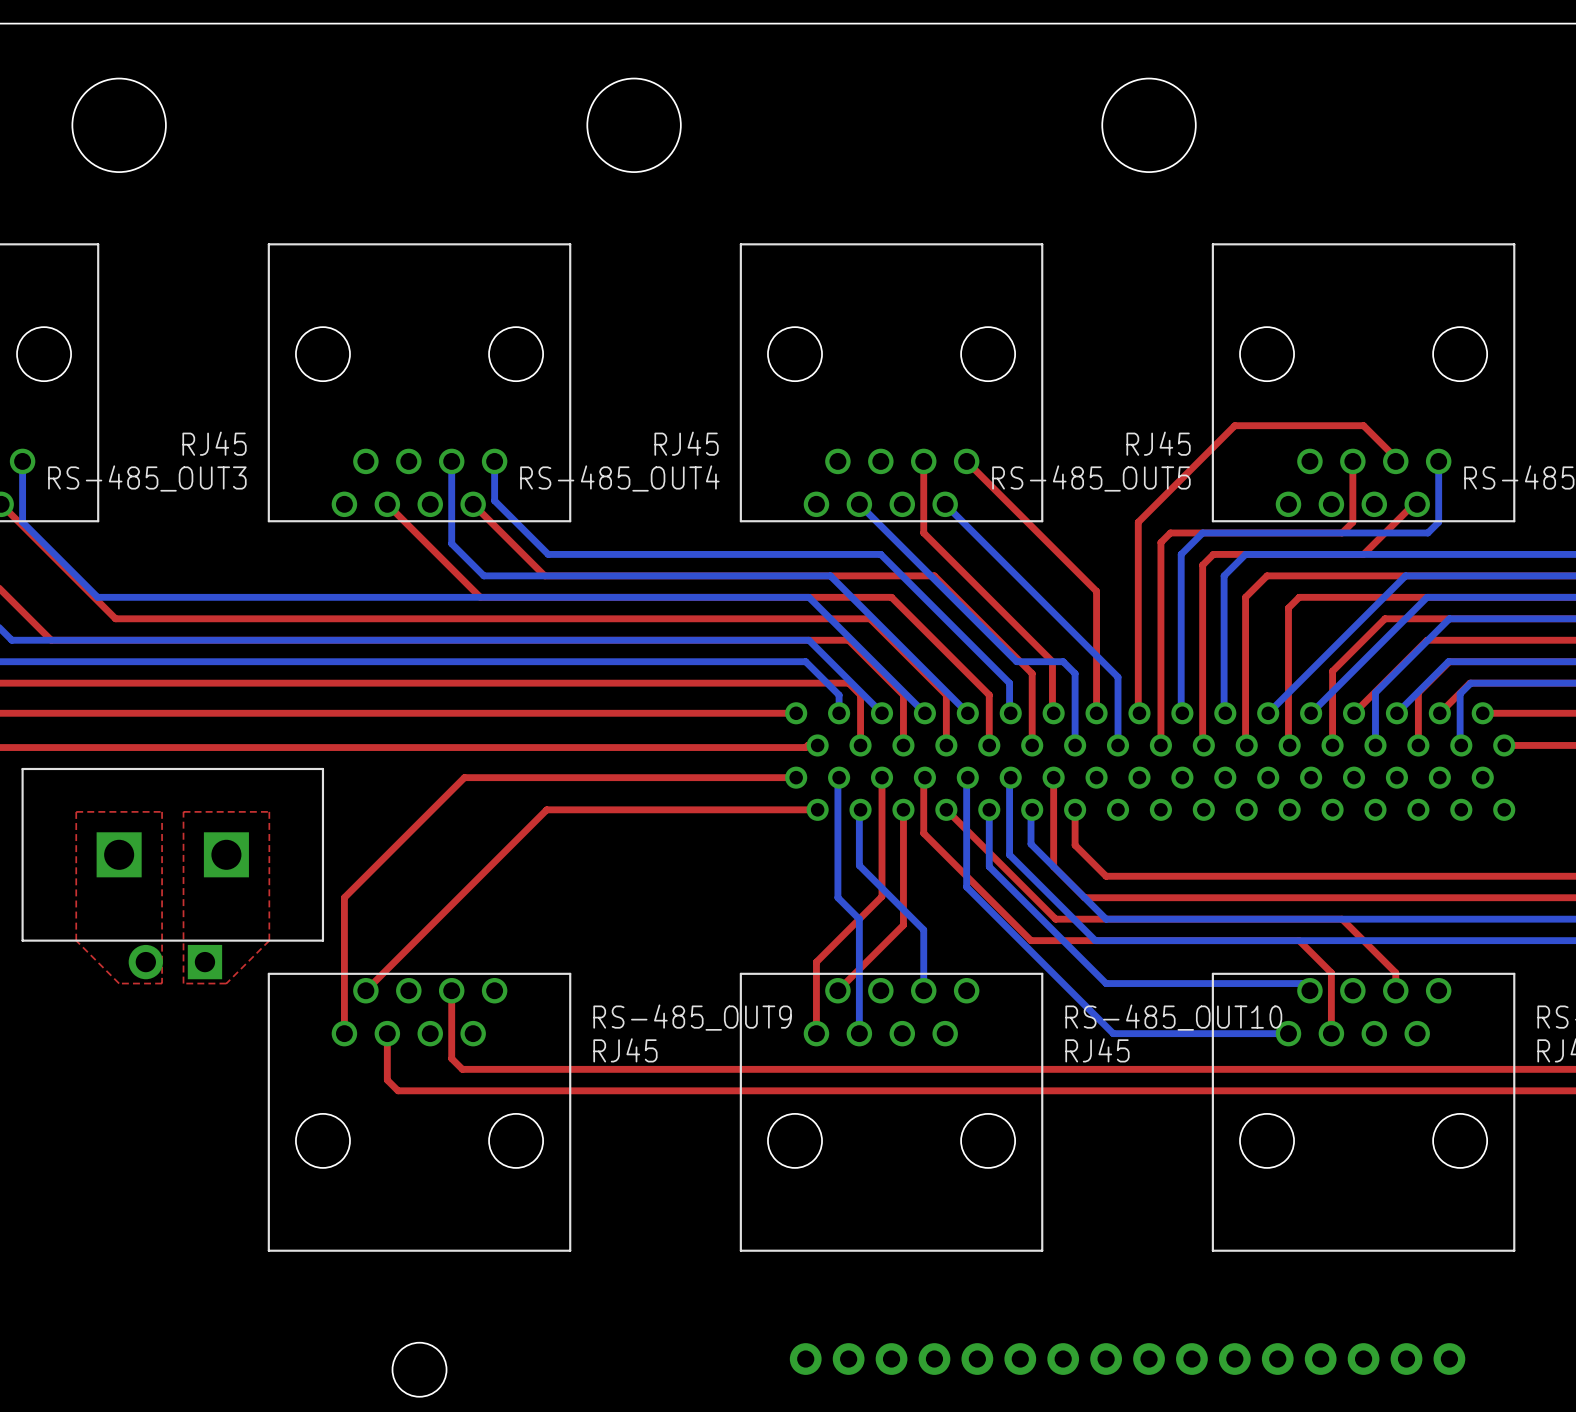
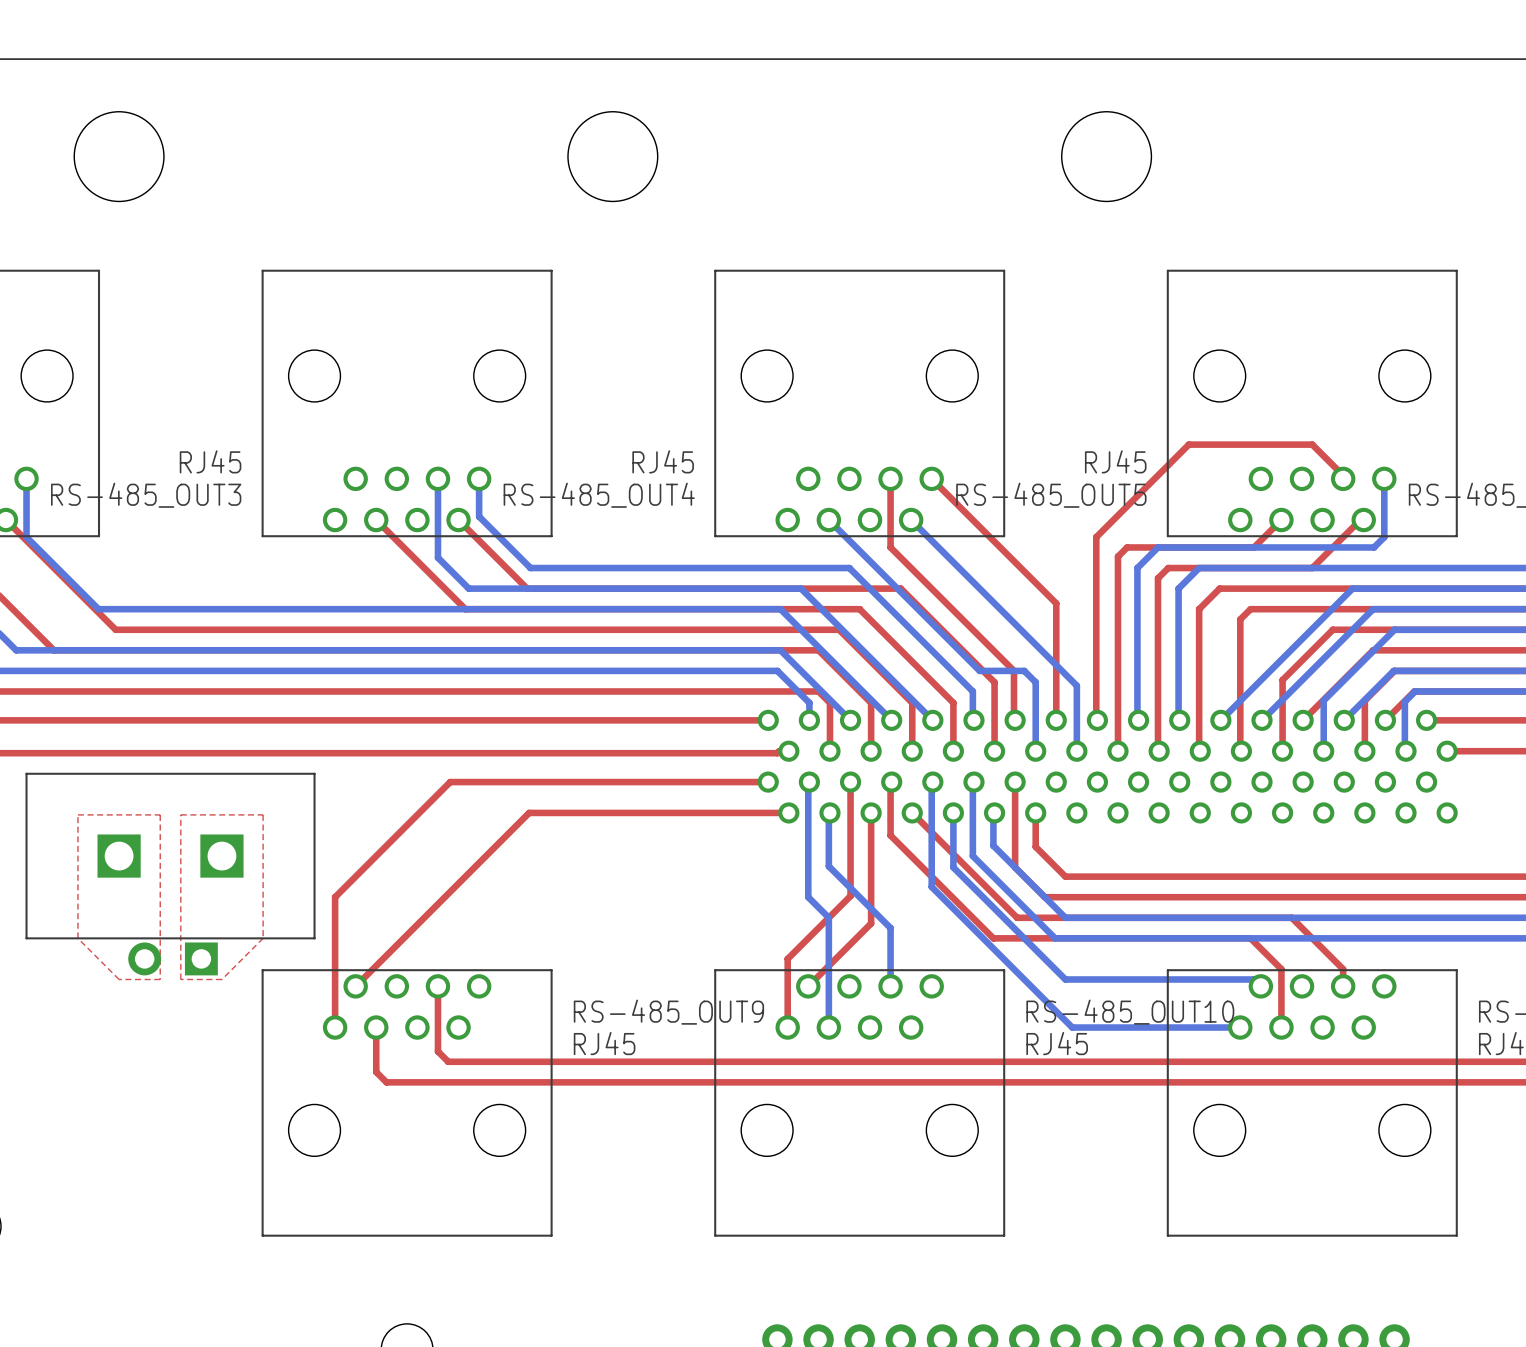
top track: (1352, 461) (1352, 522) (1342, 532) (1302, 532) -> (1281, 520) (1253, 547)

